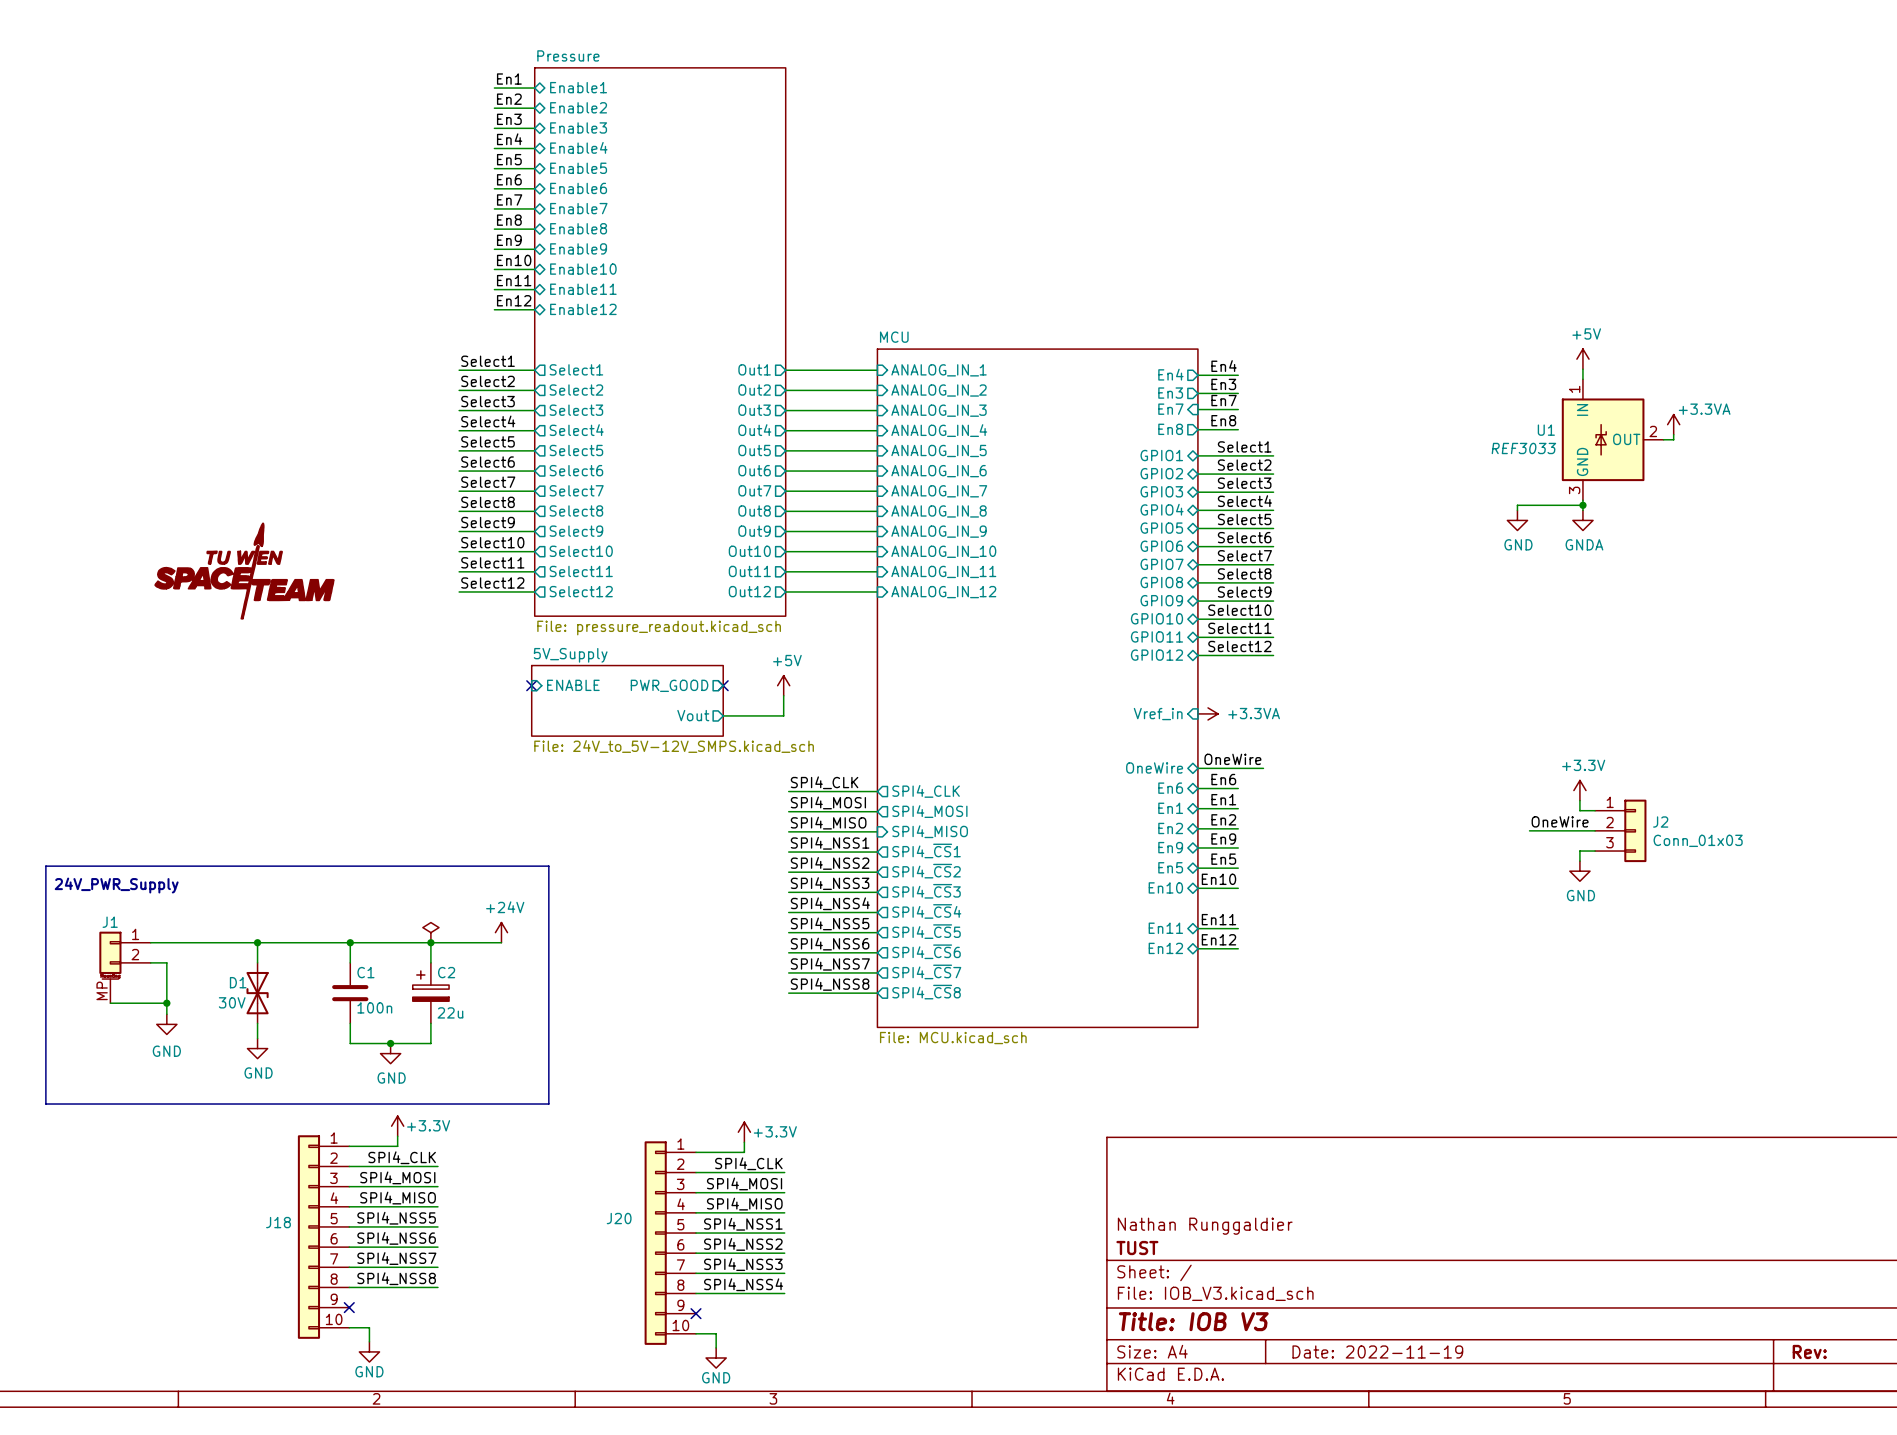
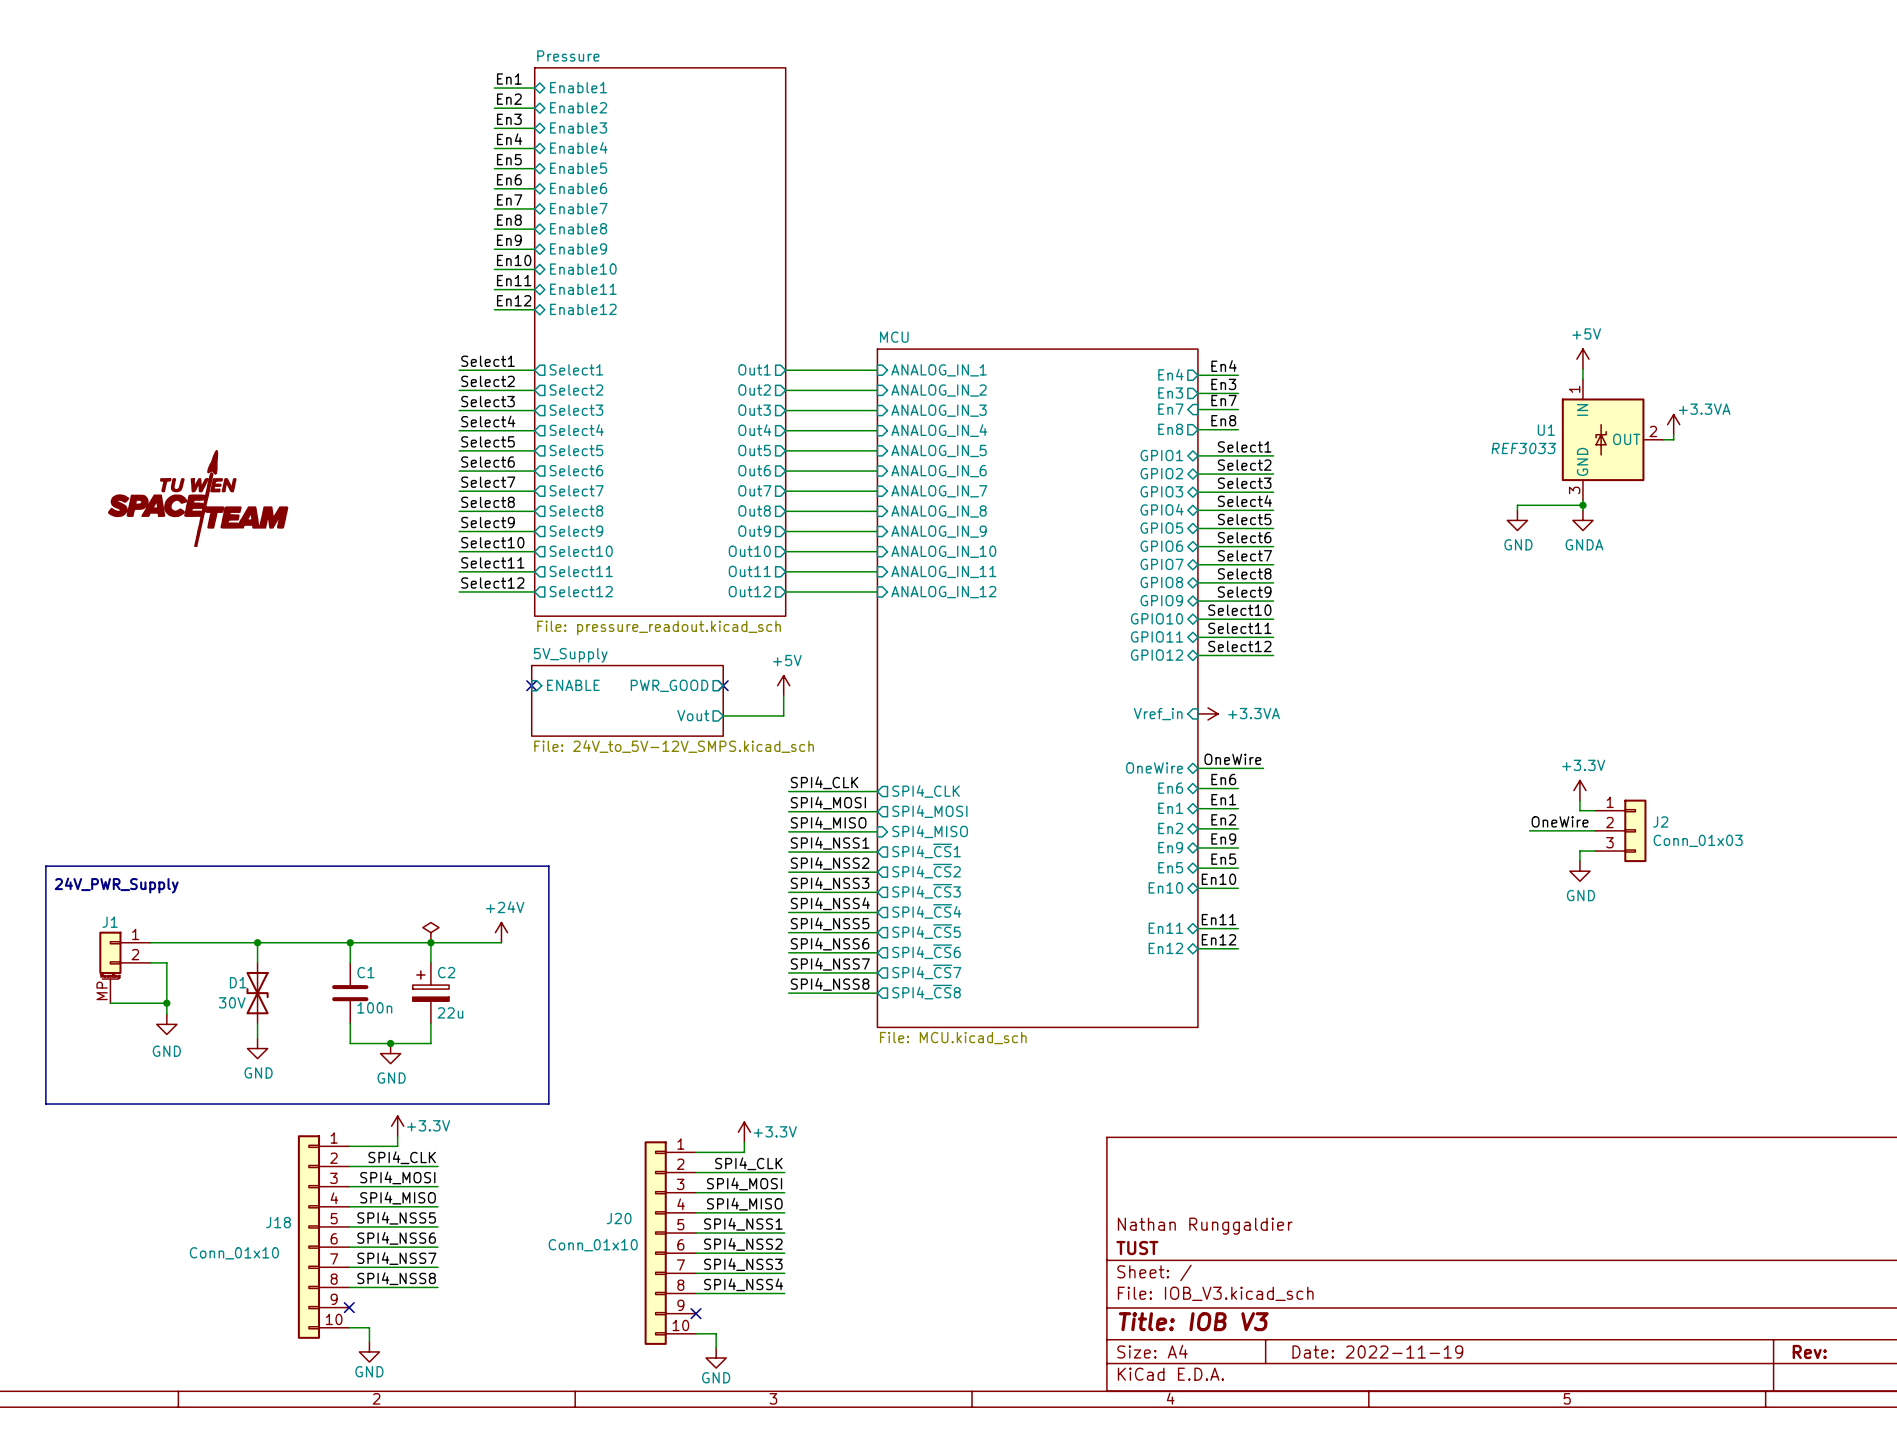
part: none -> (198, 498)
power symbol: (244, 571) -> none
J20 value: none -> Conn_01x10 (593, 1245)
J18 value: none -> Conn_01x10 (234, 1253)

